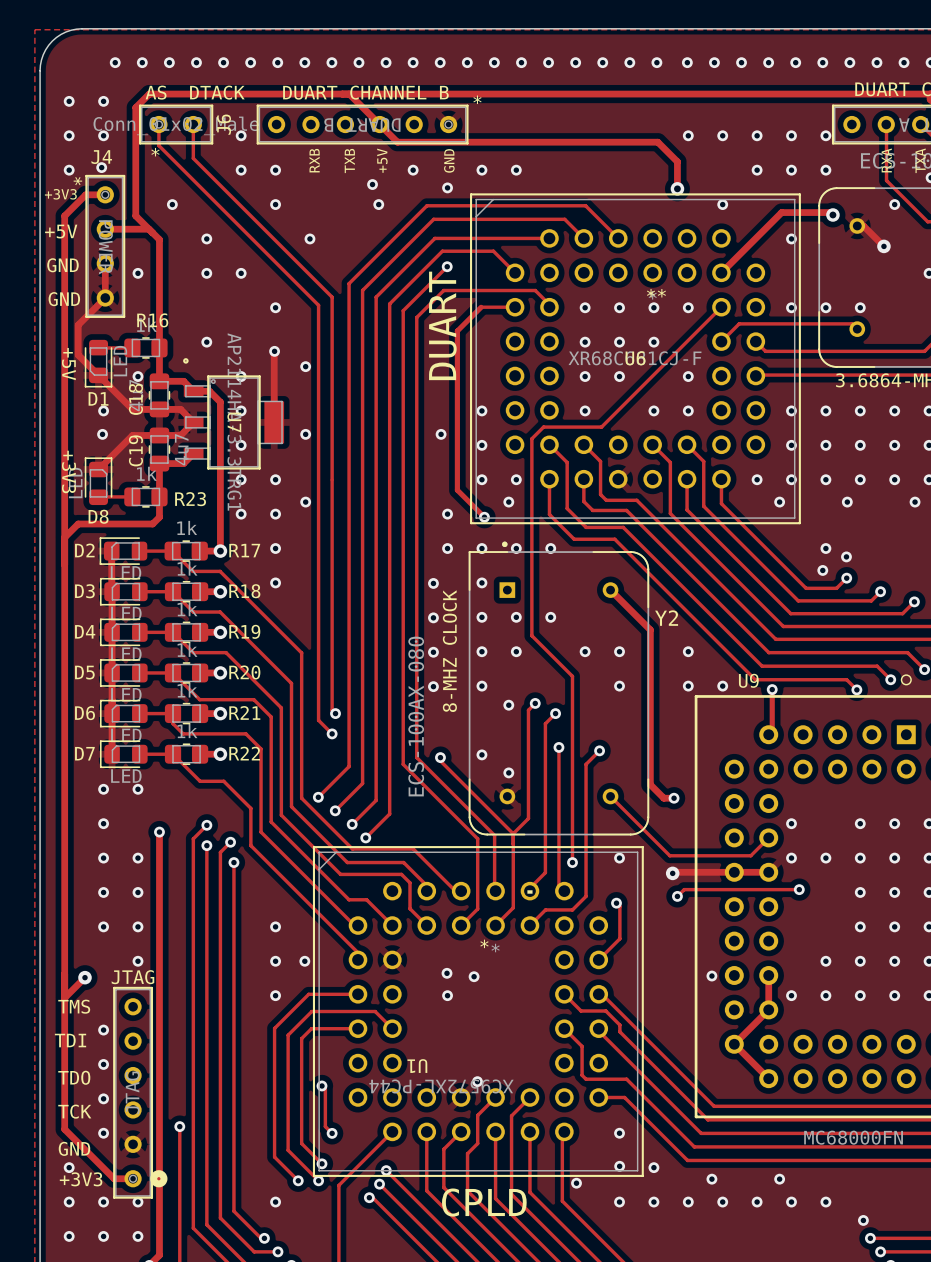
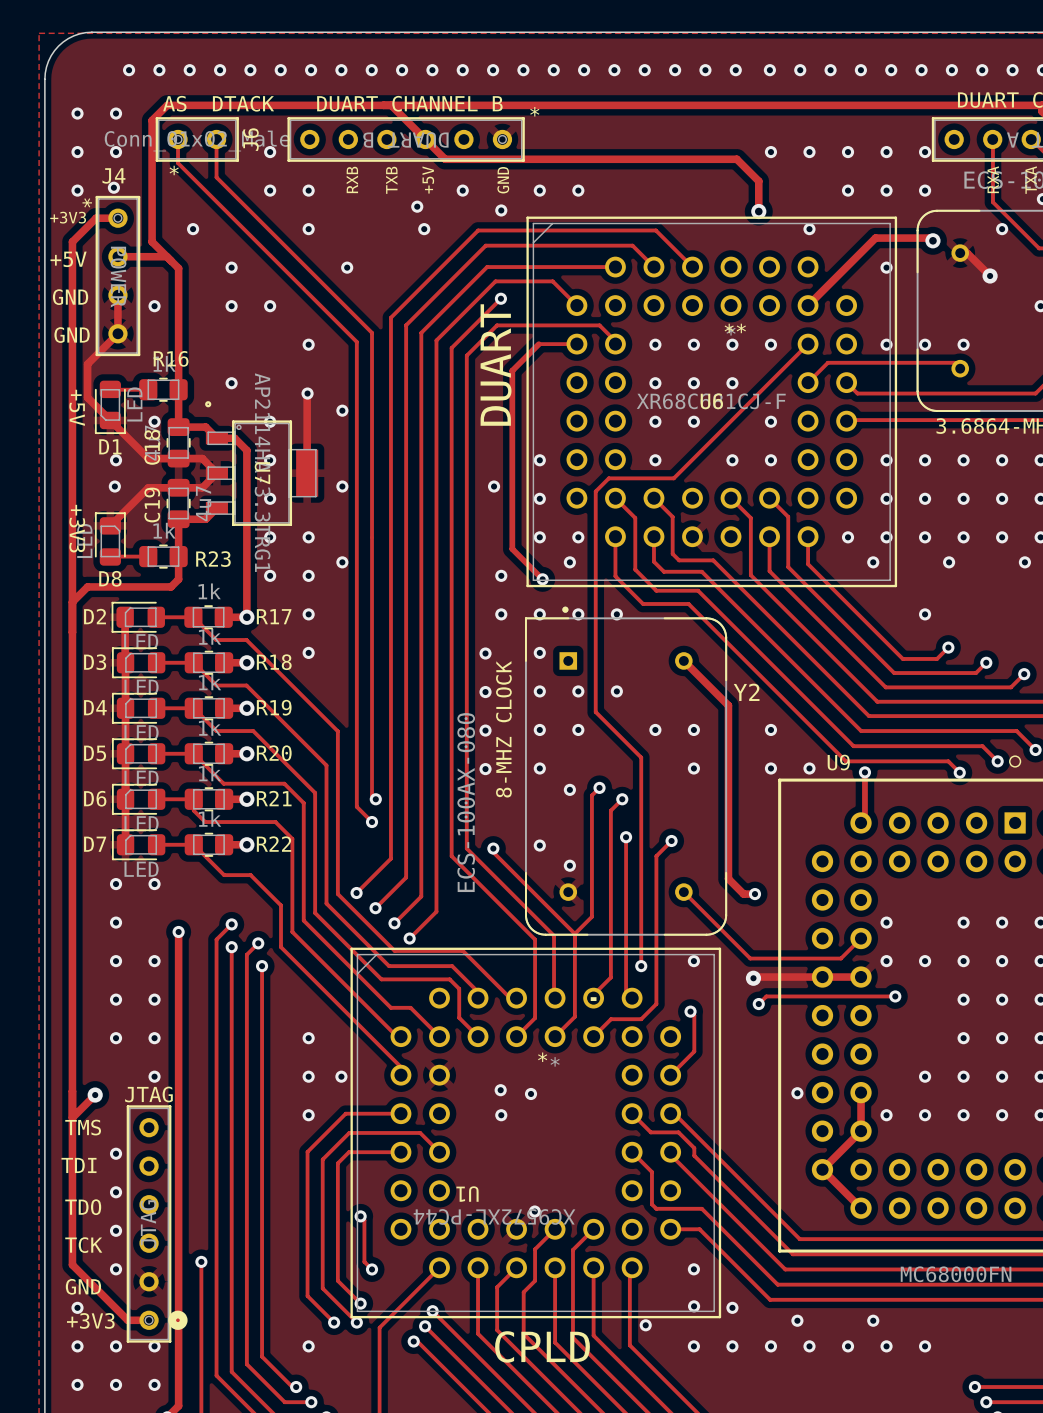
via: (846, 556) -> none
via: (822, 570) -> none
via: (863, 1220) -> none

